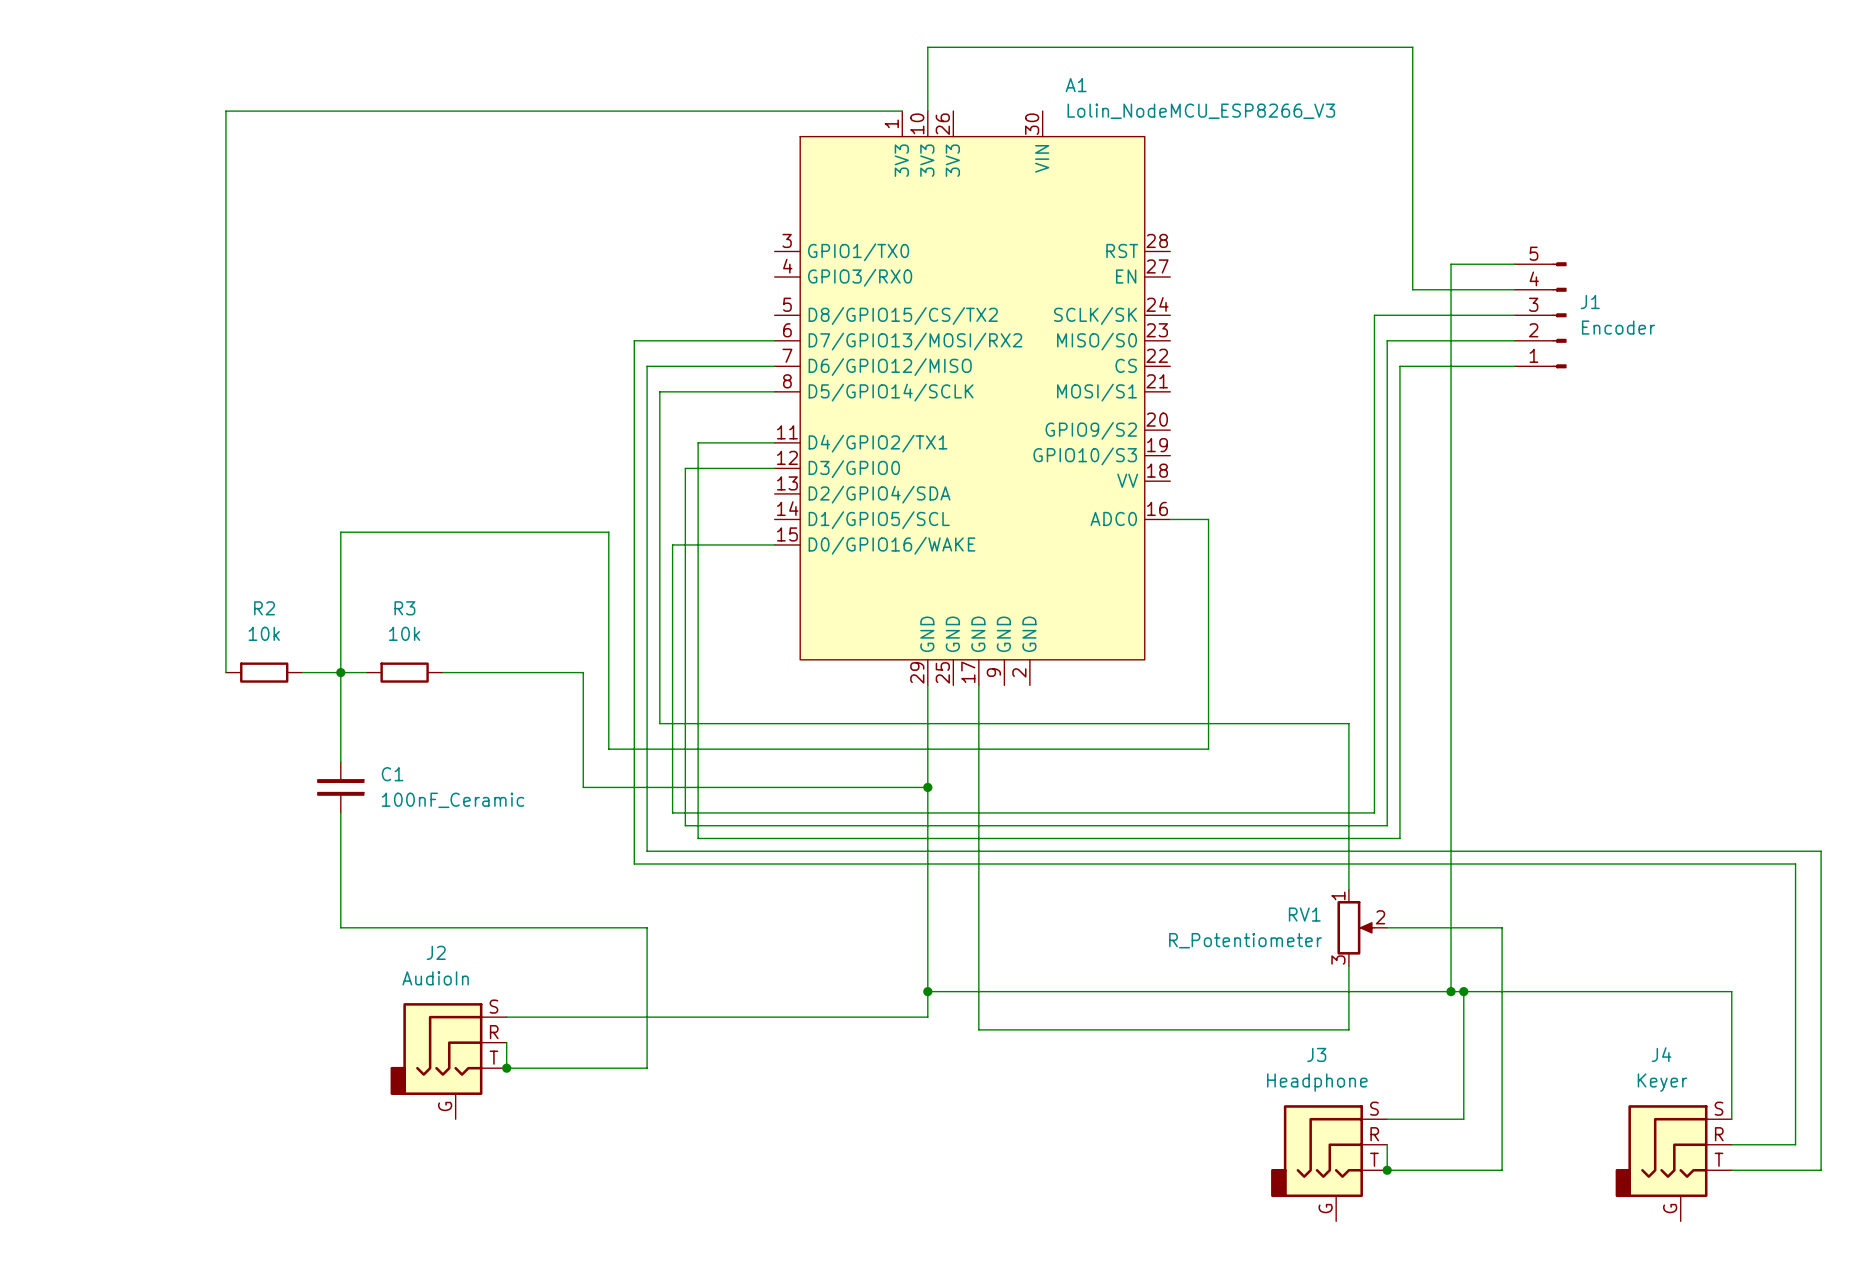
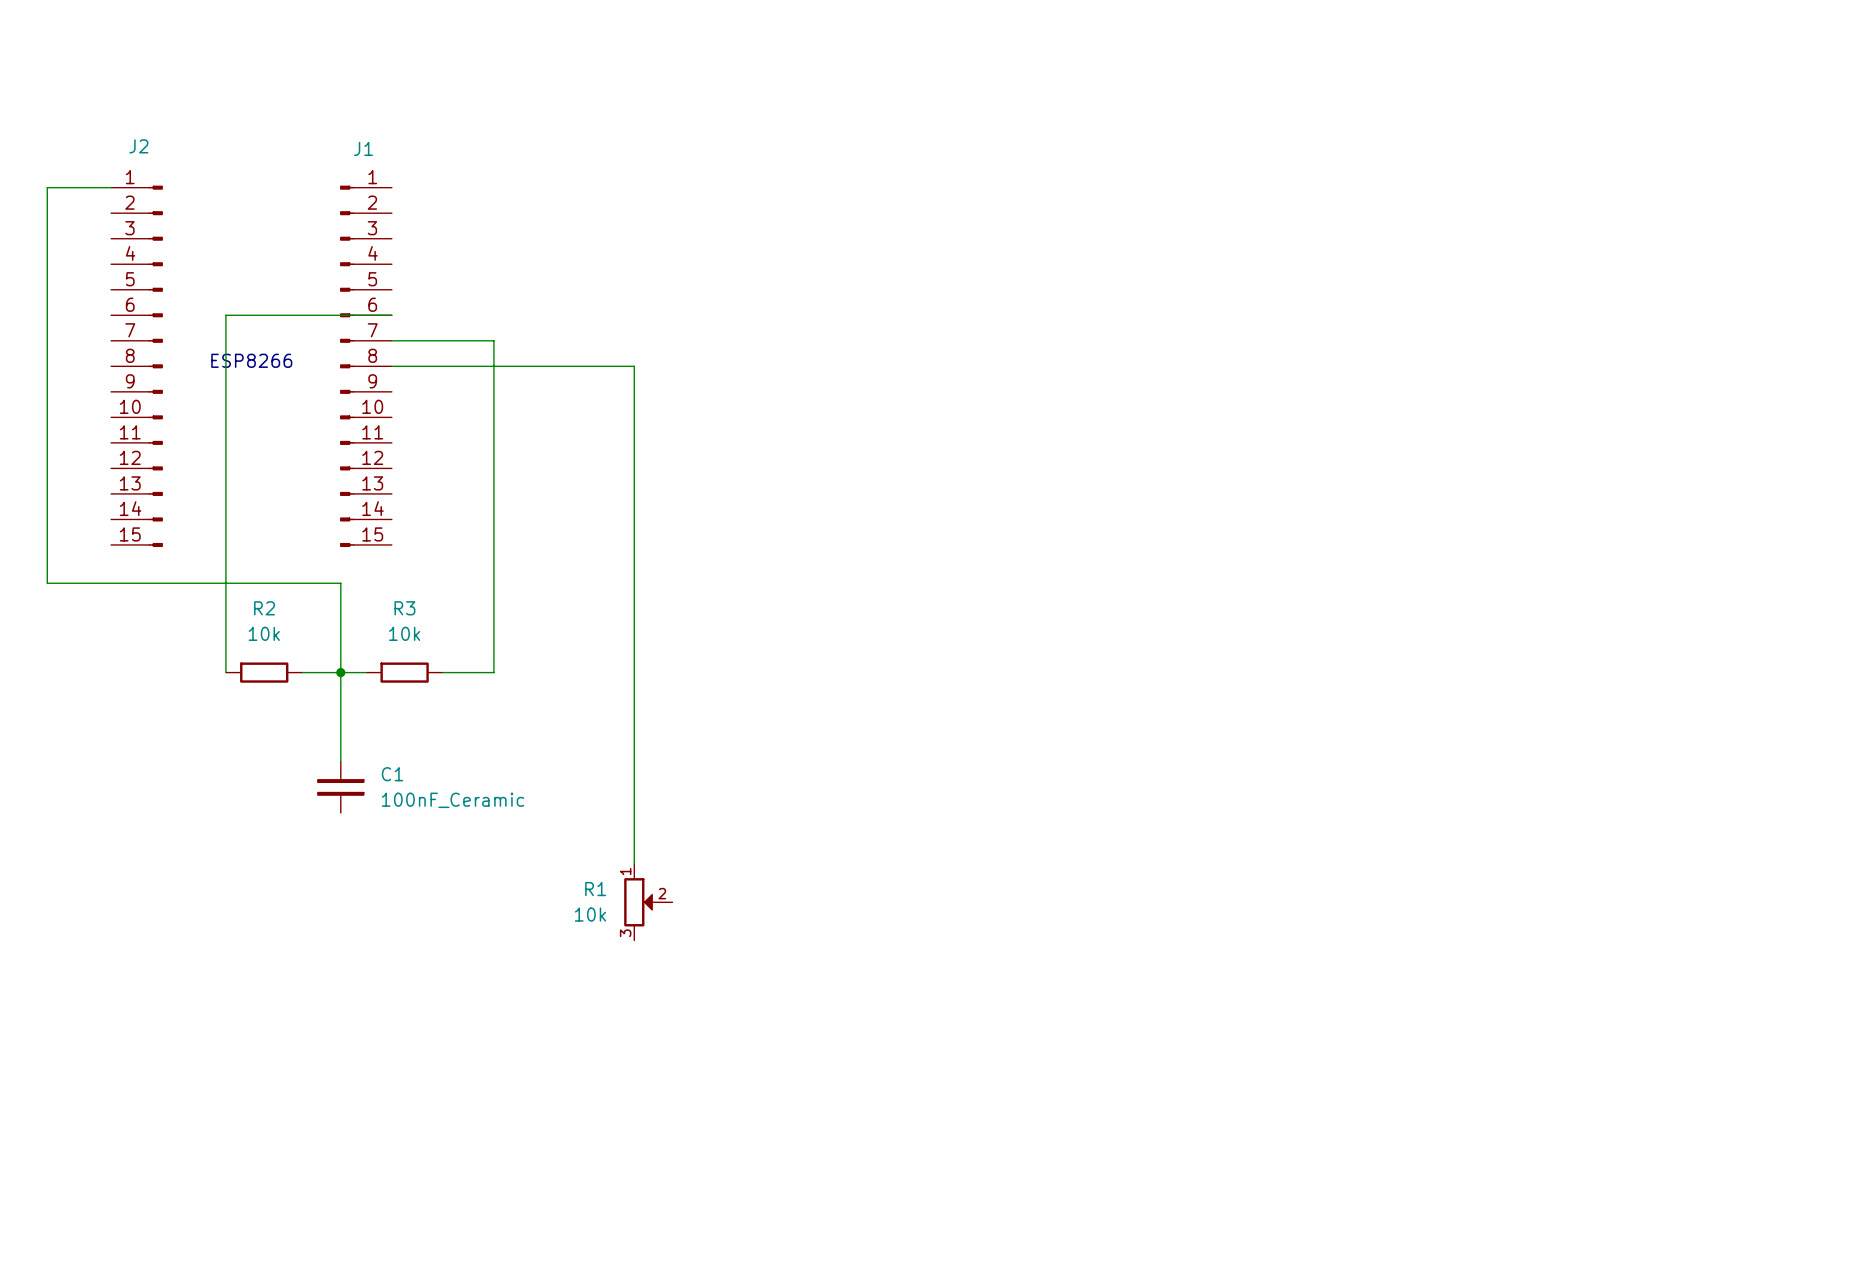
wire: (902, 111) (225, 111) (225, 315) -> (391, 315) (225, 315)
wire: (927, 111) (927, 47) (1412, 47) (1412, 289) (1514, 289) -> none
J1 symbol: [1514, 262, 1567, 369] -> [340, 185, 392, 548]
wire: (1514, 264) (1451, 264) (1451, 991) -> none
J1 name position: J1 (1590, 302) -> J1 (363, 148)
wire: (1514, 315) (1374, 315) (1374, 812) (672, 812) (672, 544) (774, 544) -> none
J1 value: Encoder (1618, 327) -> none
wire: (774, 340) (634, 340) (634, 366) -> (391, 366) (634, 366)
wire: (1514, 340) (1387, 340) (1387, 825) (685, 825) (685, 468) (774, 468) -> none
text: none -> ESP8266 (251, 360)
wire: (774, 366) (647, 366) (647, 851) (1821, 851) (1821, 1170) (1731, 1170) -> none
wire: (1514, 366) (1399, 366) (1399, 838) (698, 838) (698, 442) (774, 442) -> none
wire: (774, 391) (659, 391) (659, 723) (1348, 723) (1348, 889) -> none
A1: Lolin_NodeMCU_ESP8266_V3 (972, 398) -> none
wire: (1170, 519) (1208, 519) (1208, 749) (608, 749) (608, 532) (340, 532) (340, 583) -> (111, 187) (47, 187) (47, 583) (340, 583)
wire: (493, 672) (583, 672) (583, 787) (927, 787) -> (493, 672) (493, 340) (391, 340)
wire: (927, 685) (927, 1017) (506, 1017) -> none
wire: (978, 685) (978, 1029) (1348, 1029) (1348, 966) -> none
junction: (927, 787) -> none
wire: (340, 812) (340, 927) (647, 927) (647, 1068) (506, 1068) (506, 1042) -> none
wire: (634, 864) (1795, 864) (1795, 1144) (1731, 1144) -> none
R1: none -> 10k (648, 902)
RV1: R_Potentiometer (1362, 927) -> none
wire: (1387, 927) (1502, 927) (1502, 1170) (1387, 1170) (1387, 1144) -> none
J2 name position: J2 (436, 952) -> J2 (138, 146)
J2 value: AudioIn (435, 978) -> none
wire: (927, 991) (1731, 991) (1731, 1119) -> none
junction: (927, 991) -> none
junction: (1451, 991) -> none
wire: (1463, 991) (1463, 1119) (1387, 1119) -> none
junction: (1463, 991) -> none
J2 symbol: [390, 1003, 507, 1120] -> [111, 185, 163, 548]
junction: (506, 1068) -> none
J3: Headphone (1329, 1163) -> none
J4: Keyer (1673, 1163) -> none
junction: (1387, 1170) -> none

